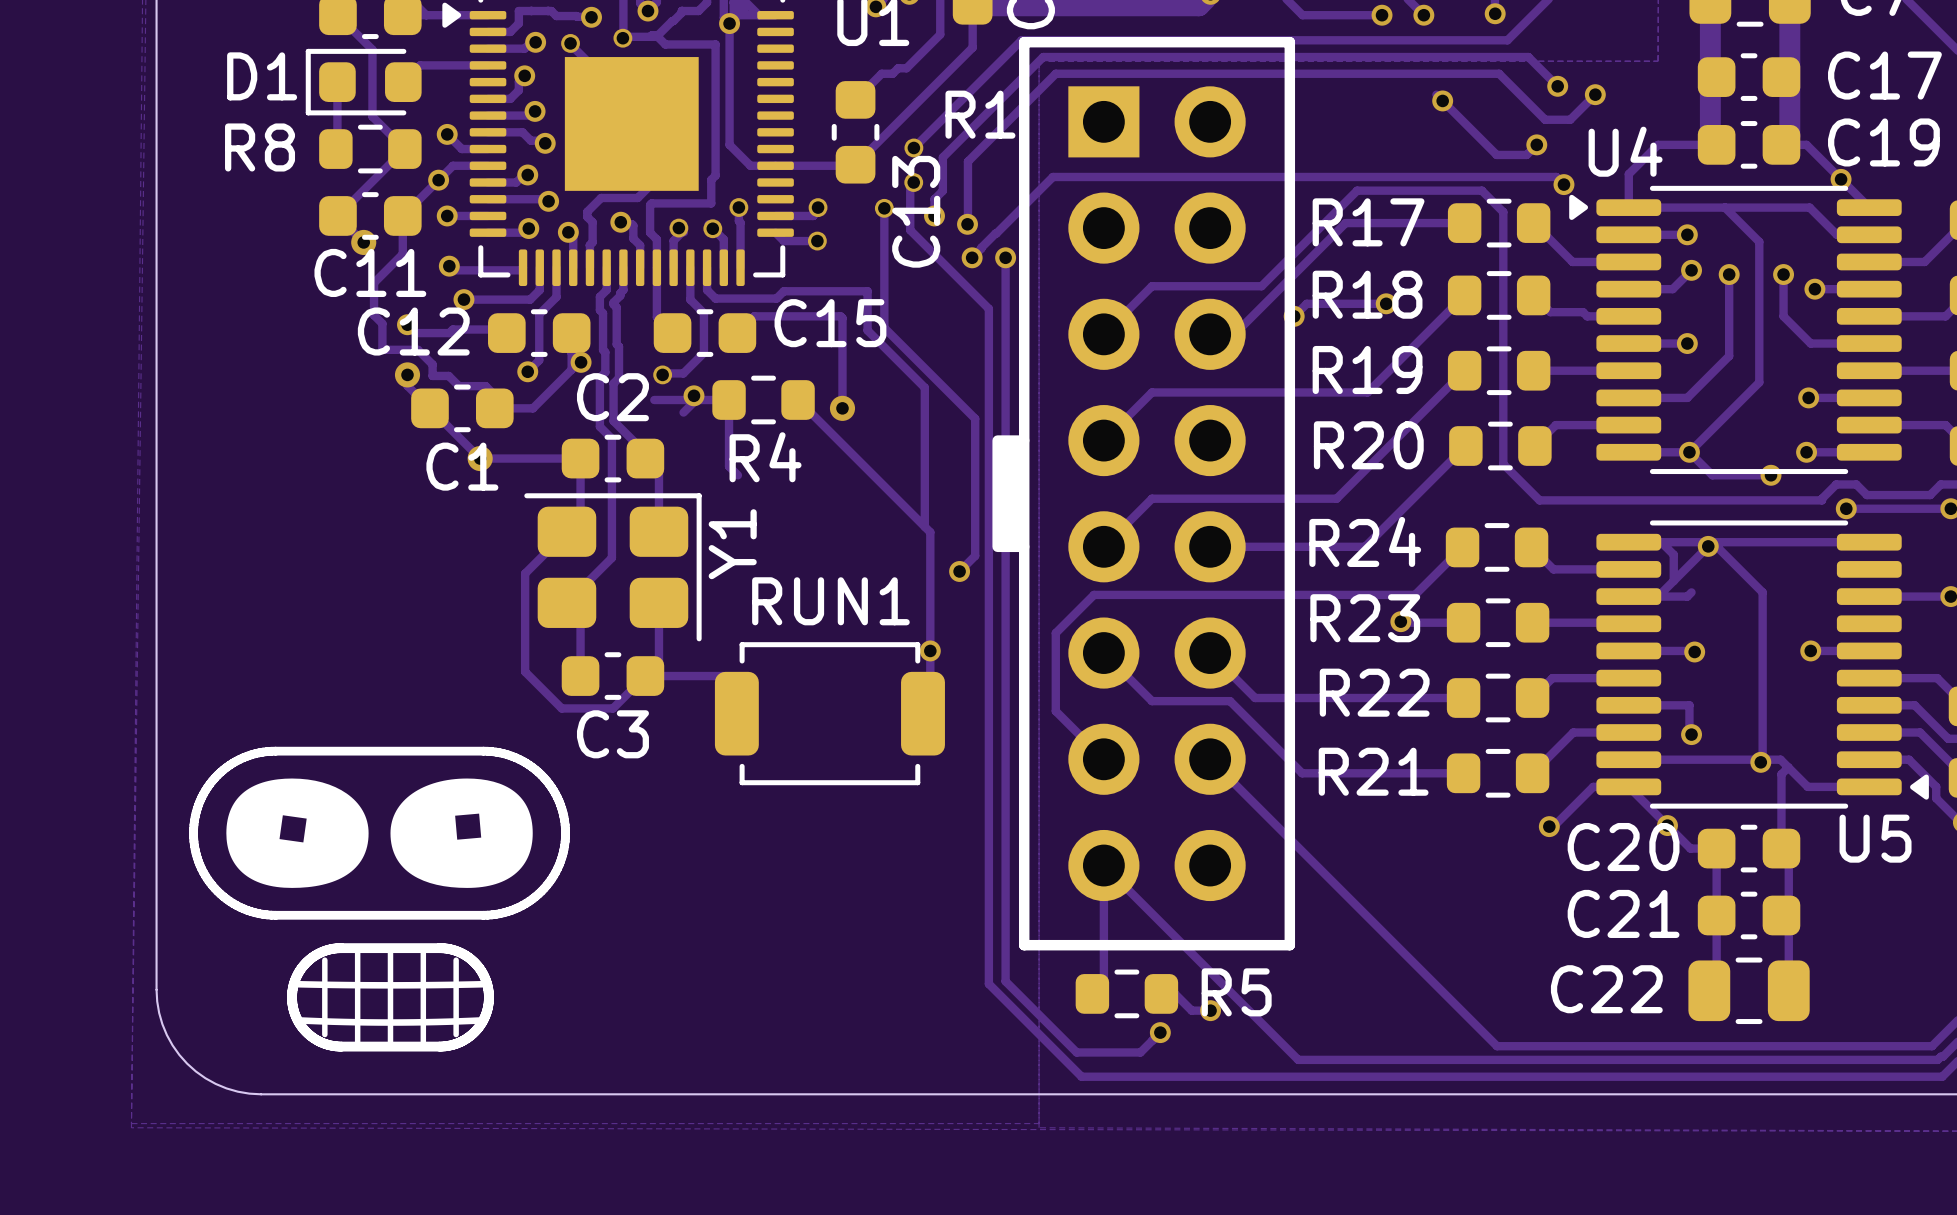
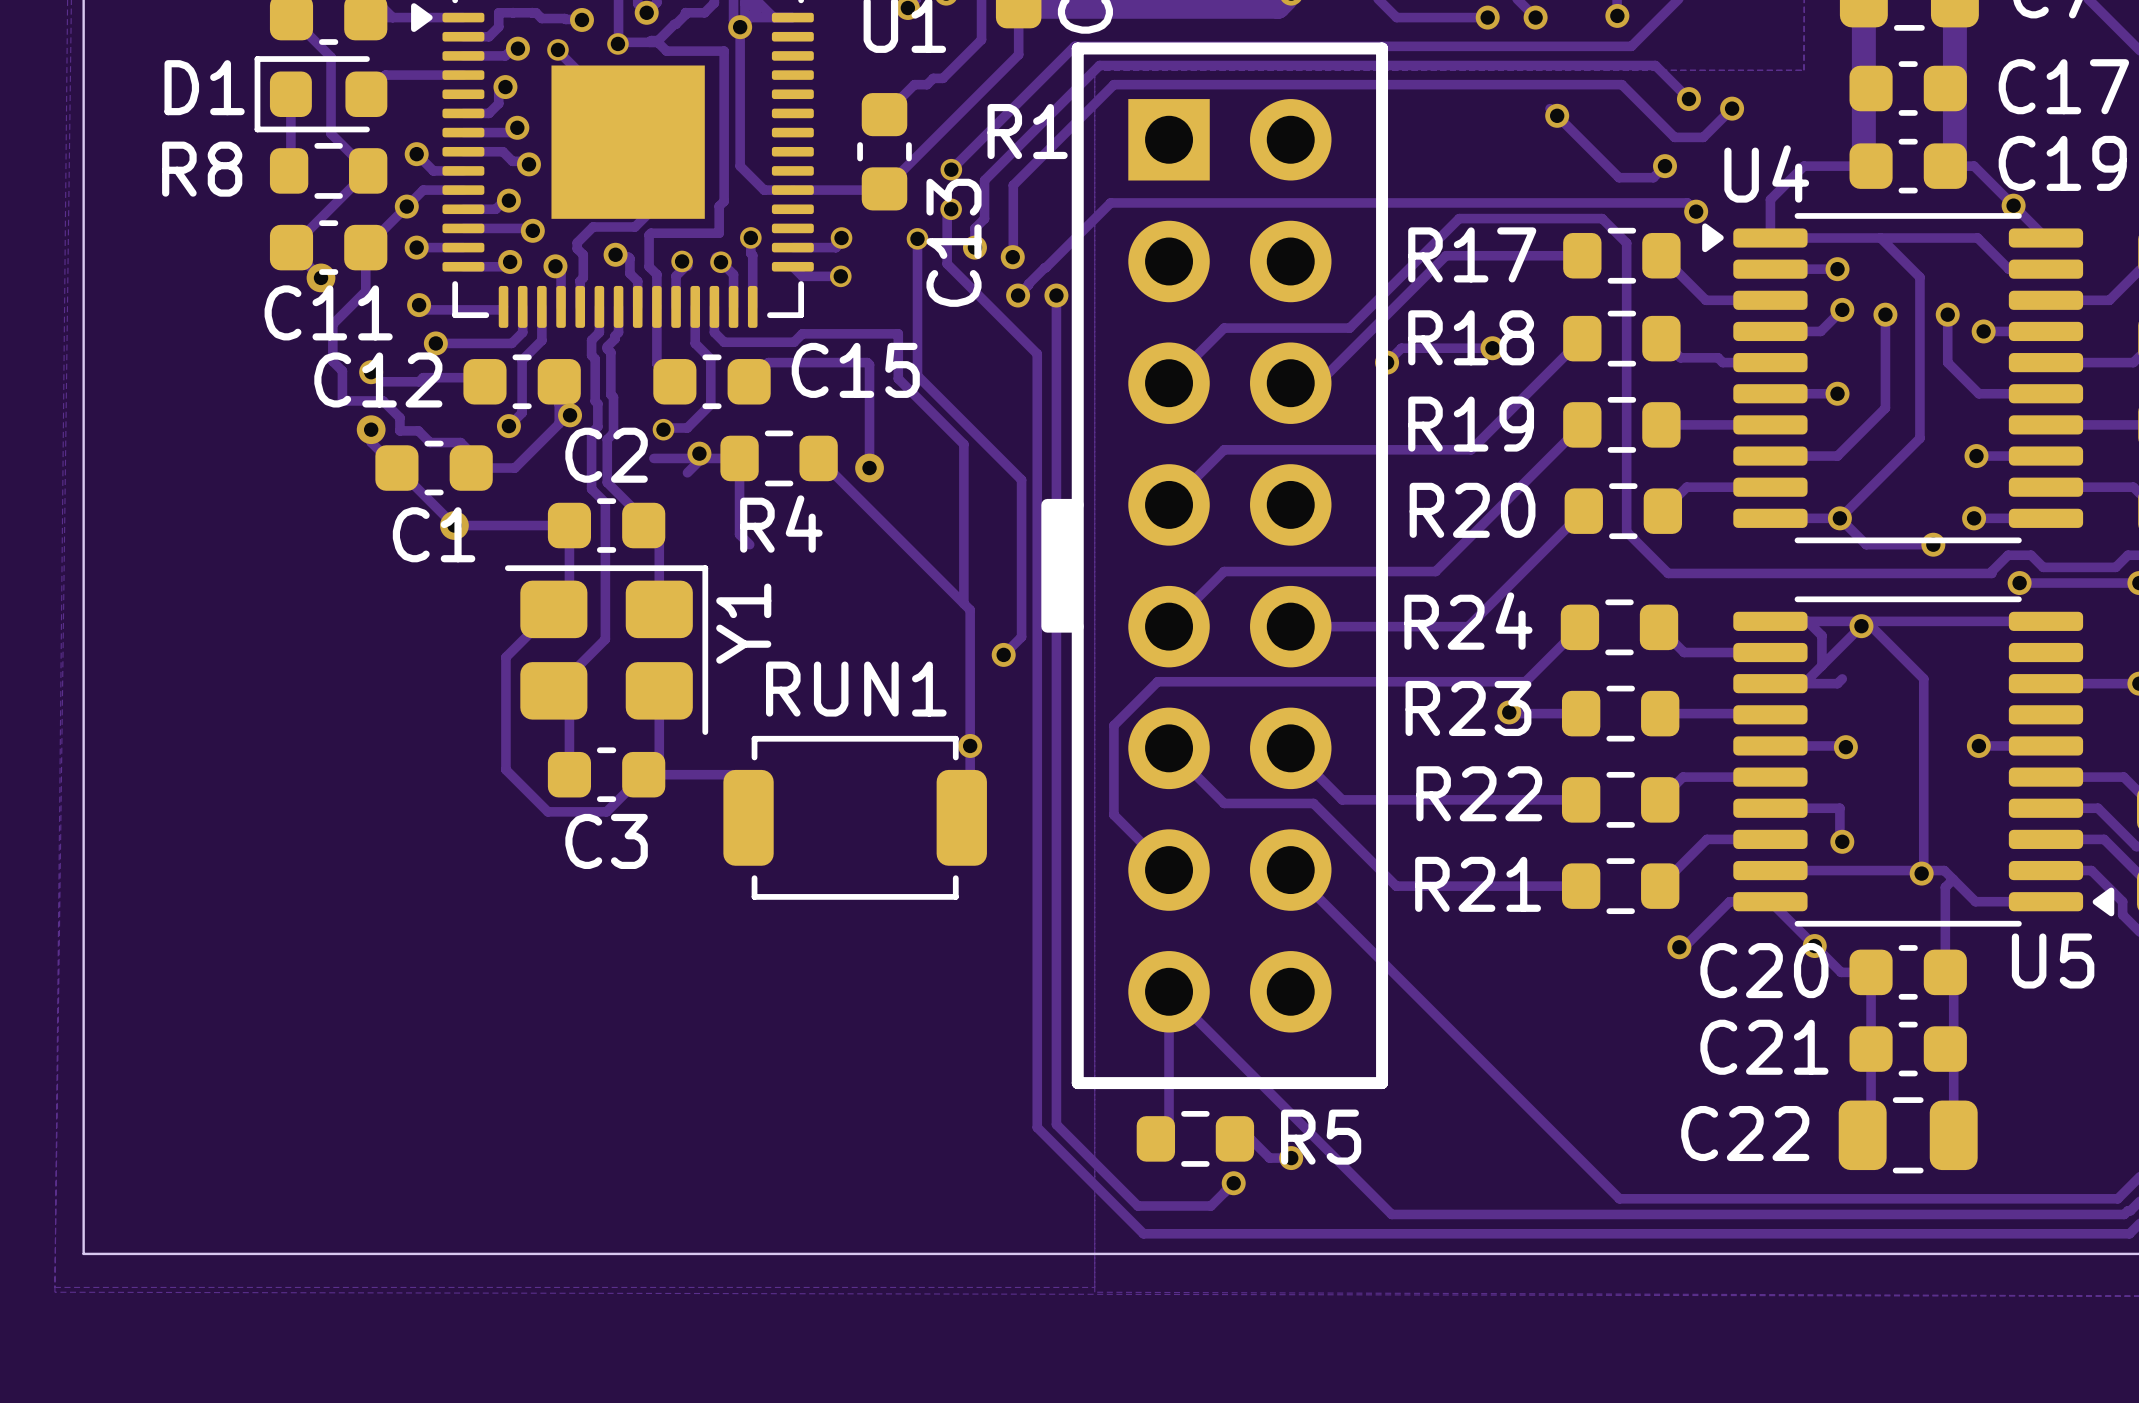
line: (271, 751) (243, 757) (220, 772) (203, 794) (194, 820) (195, 849) (205, 875) (223, 896) (247, 910) (275, 915) (495, 914) (515, 908) (535, 896) (551, 879) (560, 861) (564, 845) (565, 829) (562, 812) (557, 797) (549, 784) (538, 772) (526, 763) (511, 756) (483, 751) (271, 751) -> none
drawing: [226, 778, 533, 888] -> none
line: (341, 948) (324, 951) (309, 959) (299, 971) (293, 987) (292, 1002) (296, 1018) (306, 1032) (319, 1041) (338, 1046) (447, 1046) (469, 1036) (484, 1018) (488, 999) (485, 980) (476, 964) (461, 952) (442, 948) (341, 948) -> none
line: (390, 950) (390, 1044) -> none
line: (357, 952) (357, 1042) -> none
line: (423, 952) (423, 1042) -> none
line: (324, 960) (324, 1034) -> none
line: (456, 960) (456, 1034) -> none
line: (297, 984) (483, 984) -> none
board edge: (156, 989) (159, 1013) (166, 1035) (187, 1063) (205, 1078) (226, 1088) (261, 1094) -> (83, 1134) (83, 1253) (203, 1253)
line: (297, 1020) (390, 1022) (483, 1020) -> none

